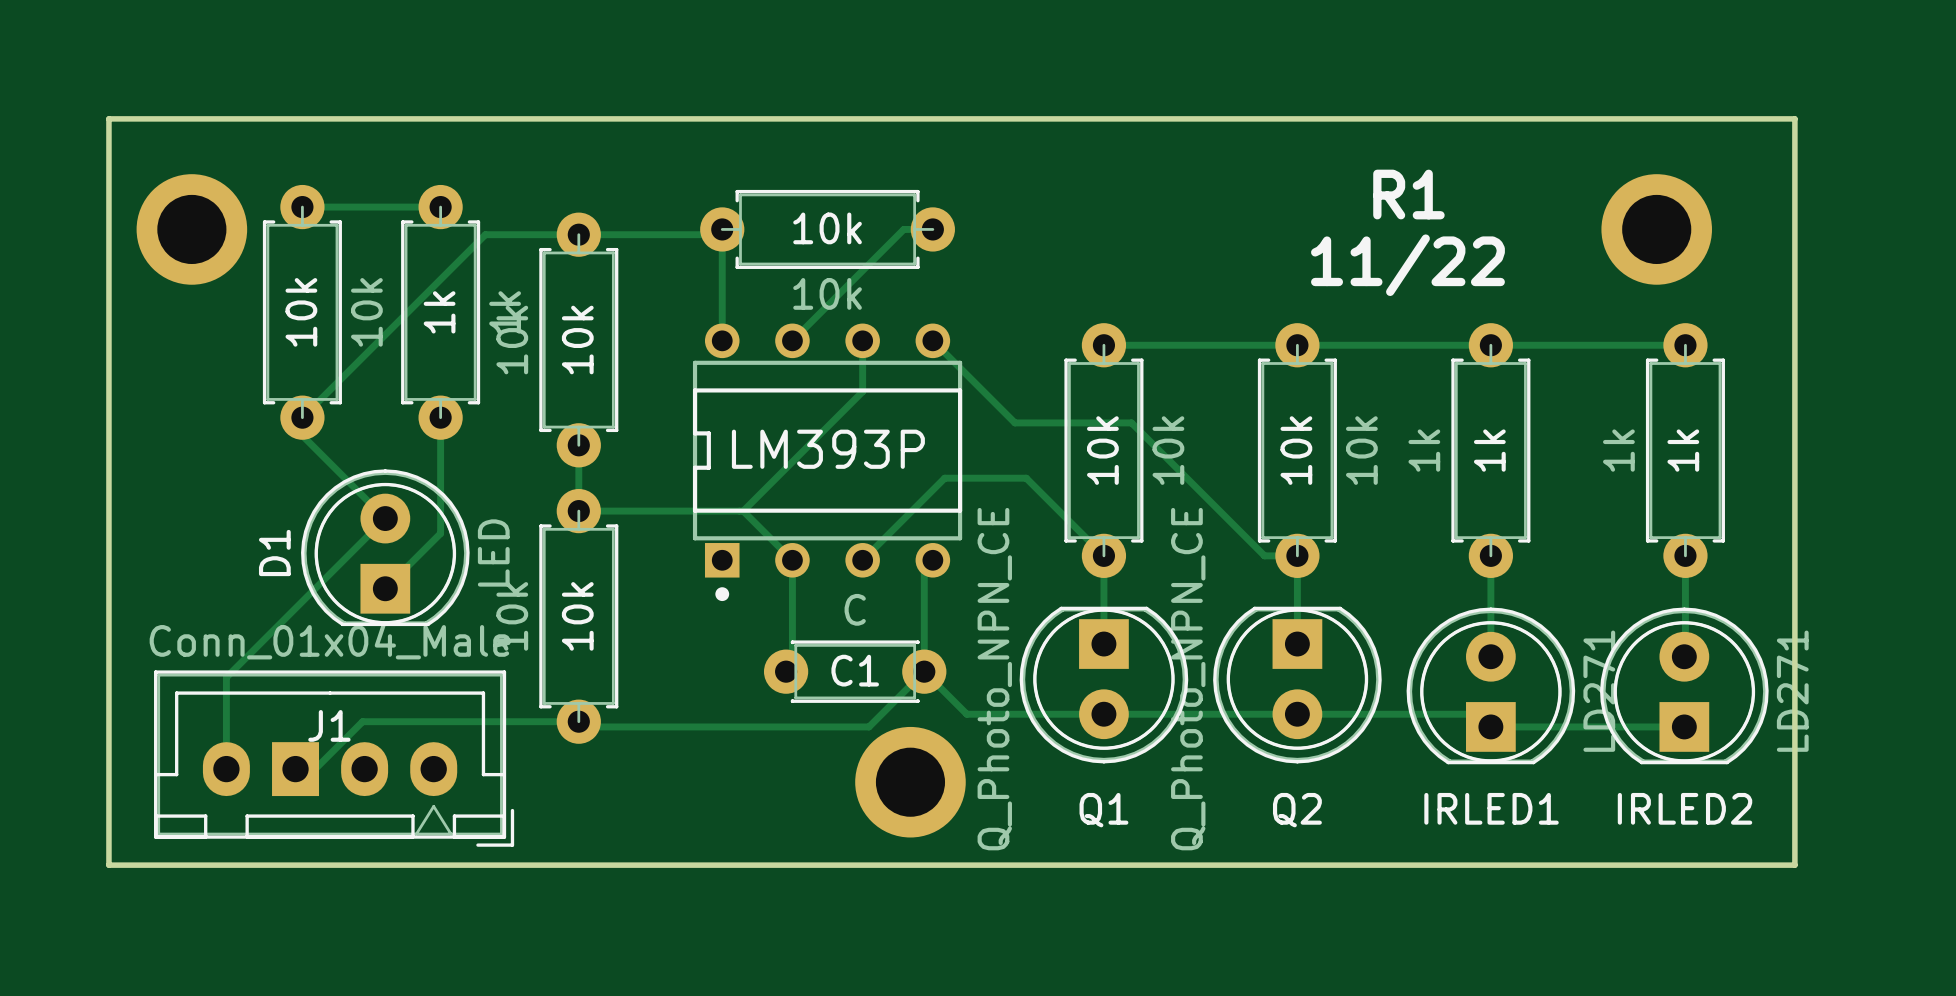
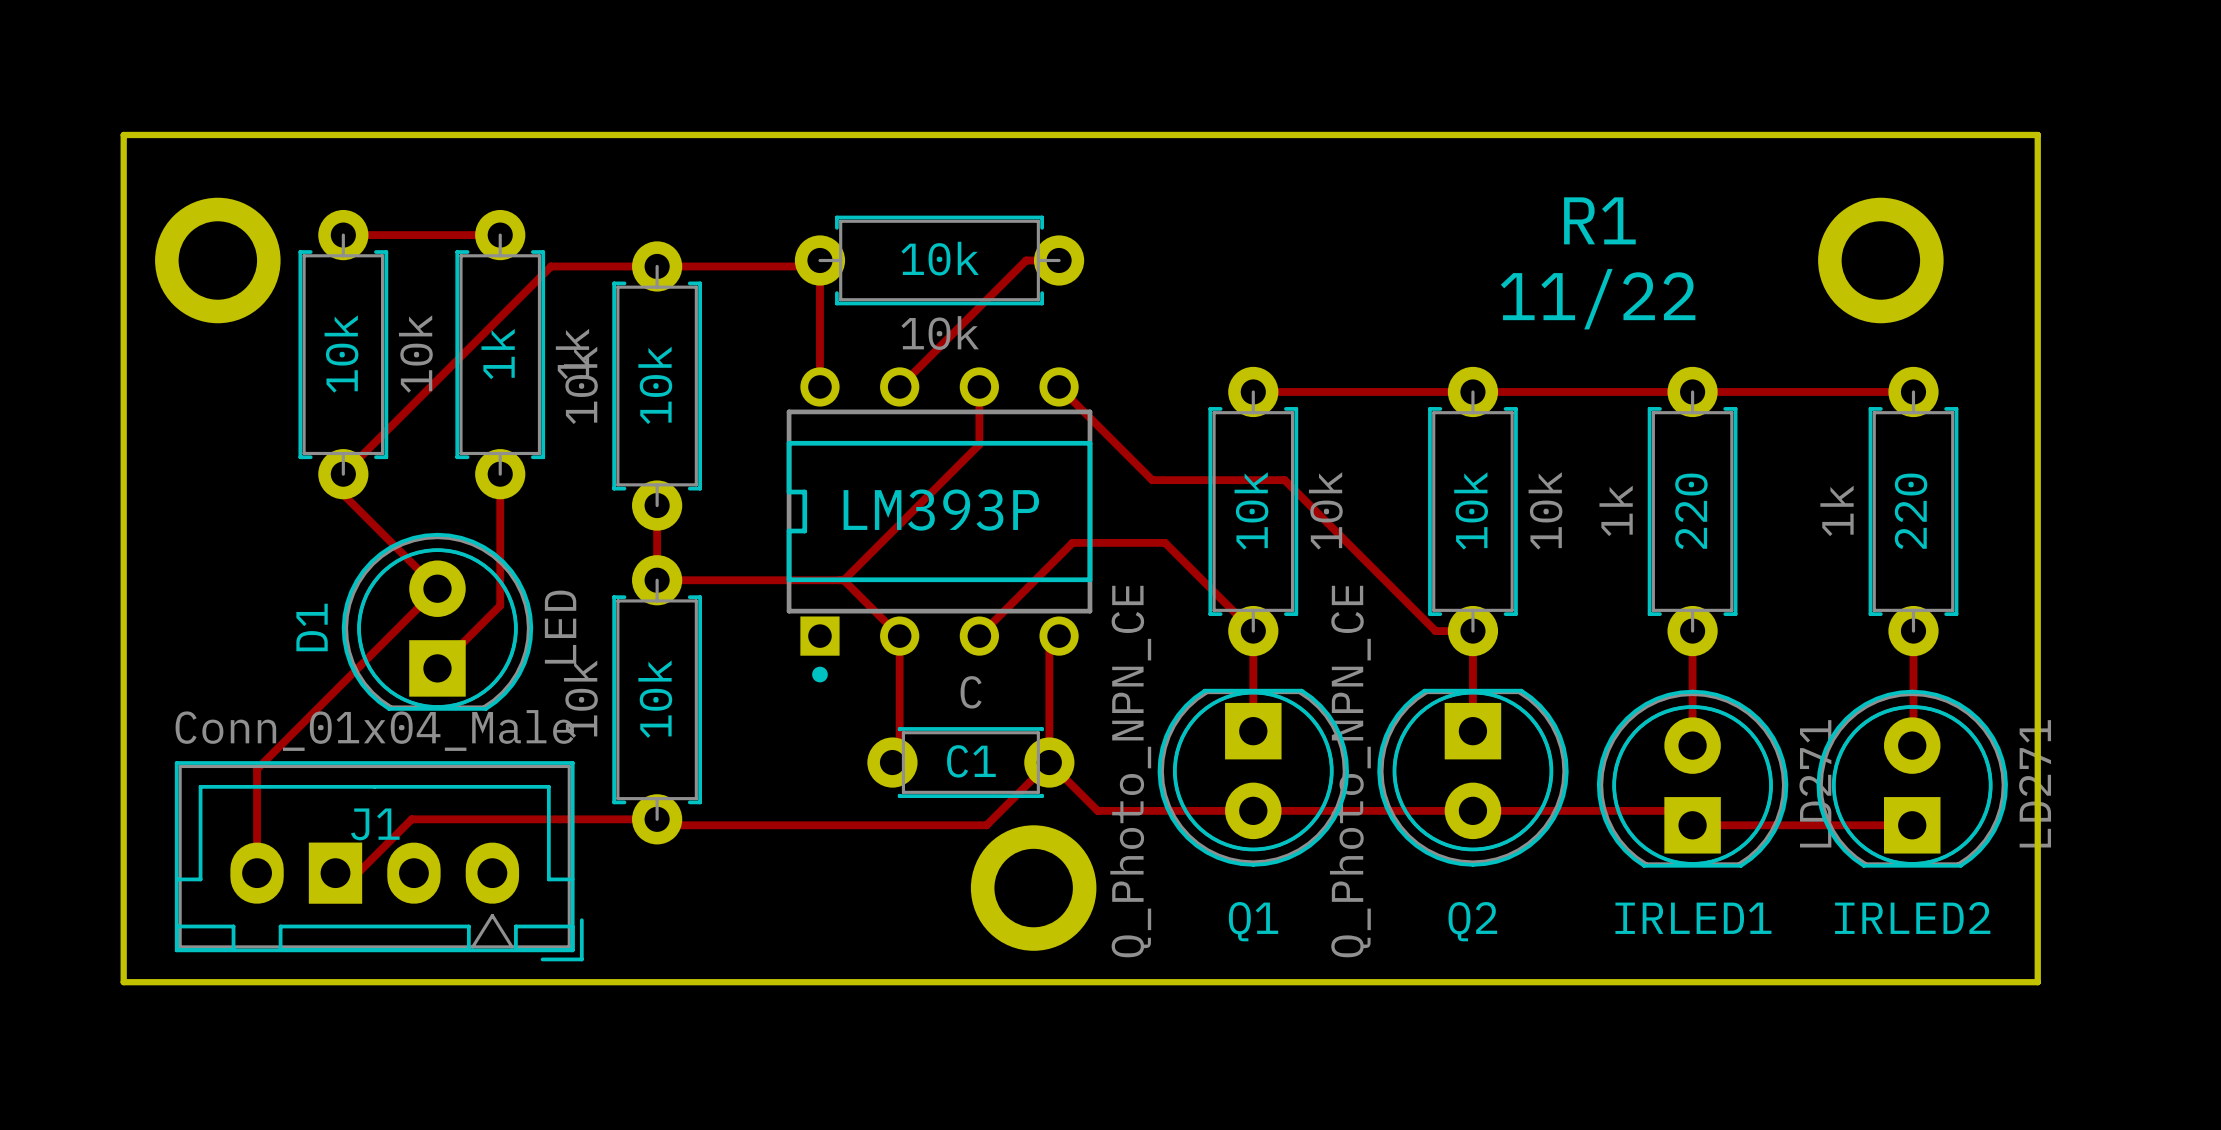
1k name: 1k (1489, 450) -> 220 (1691, 511)
1k name: 1k (1683, 450) -> 220 (1911, 511)

